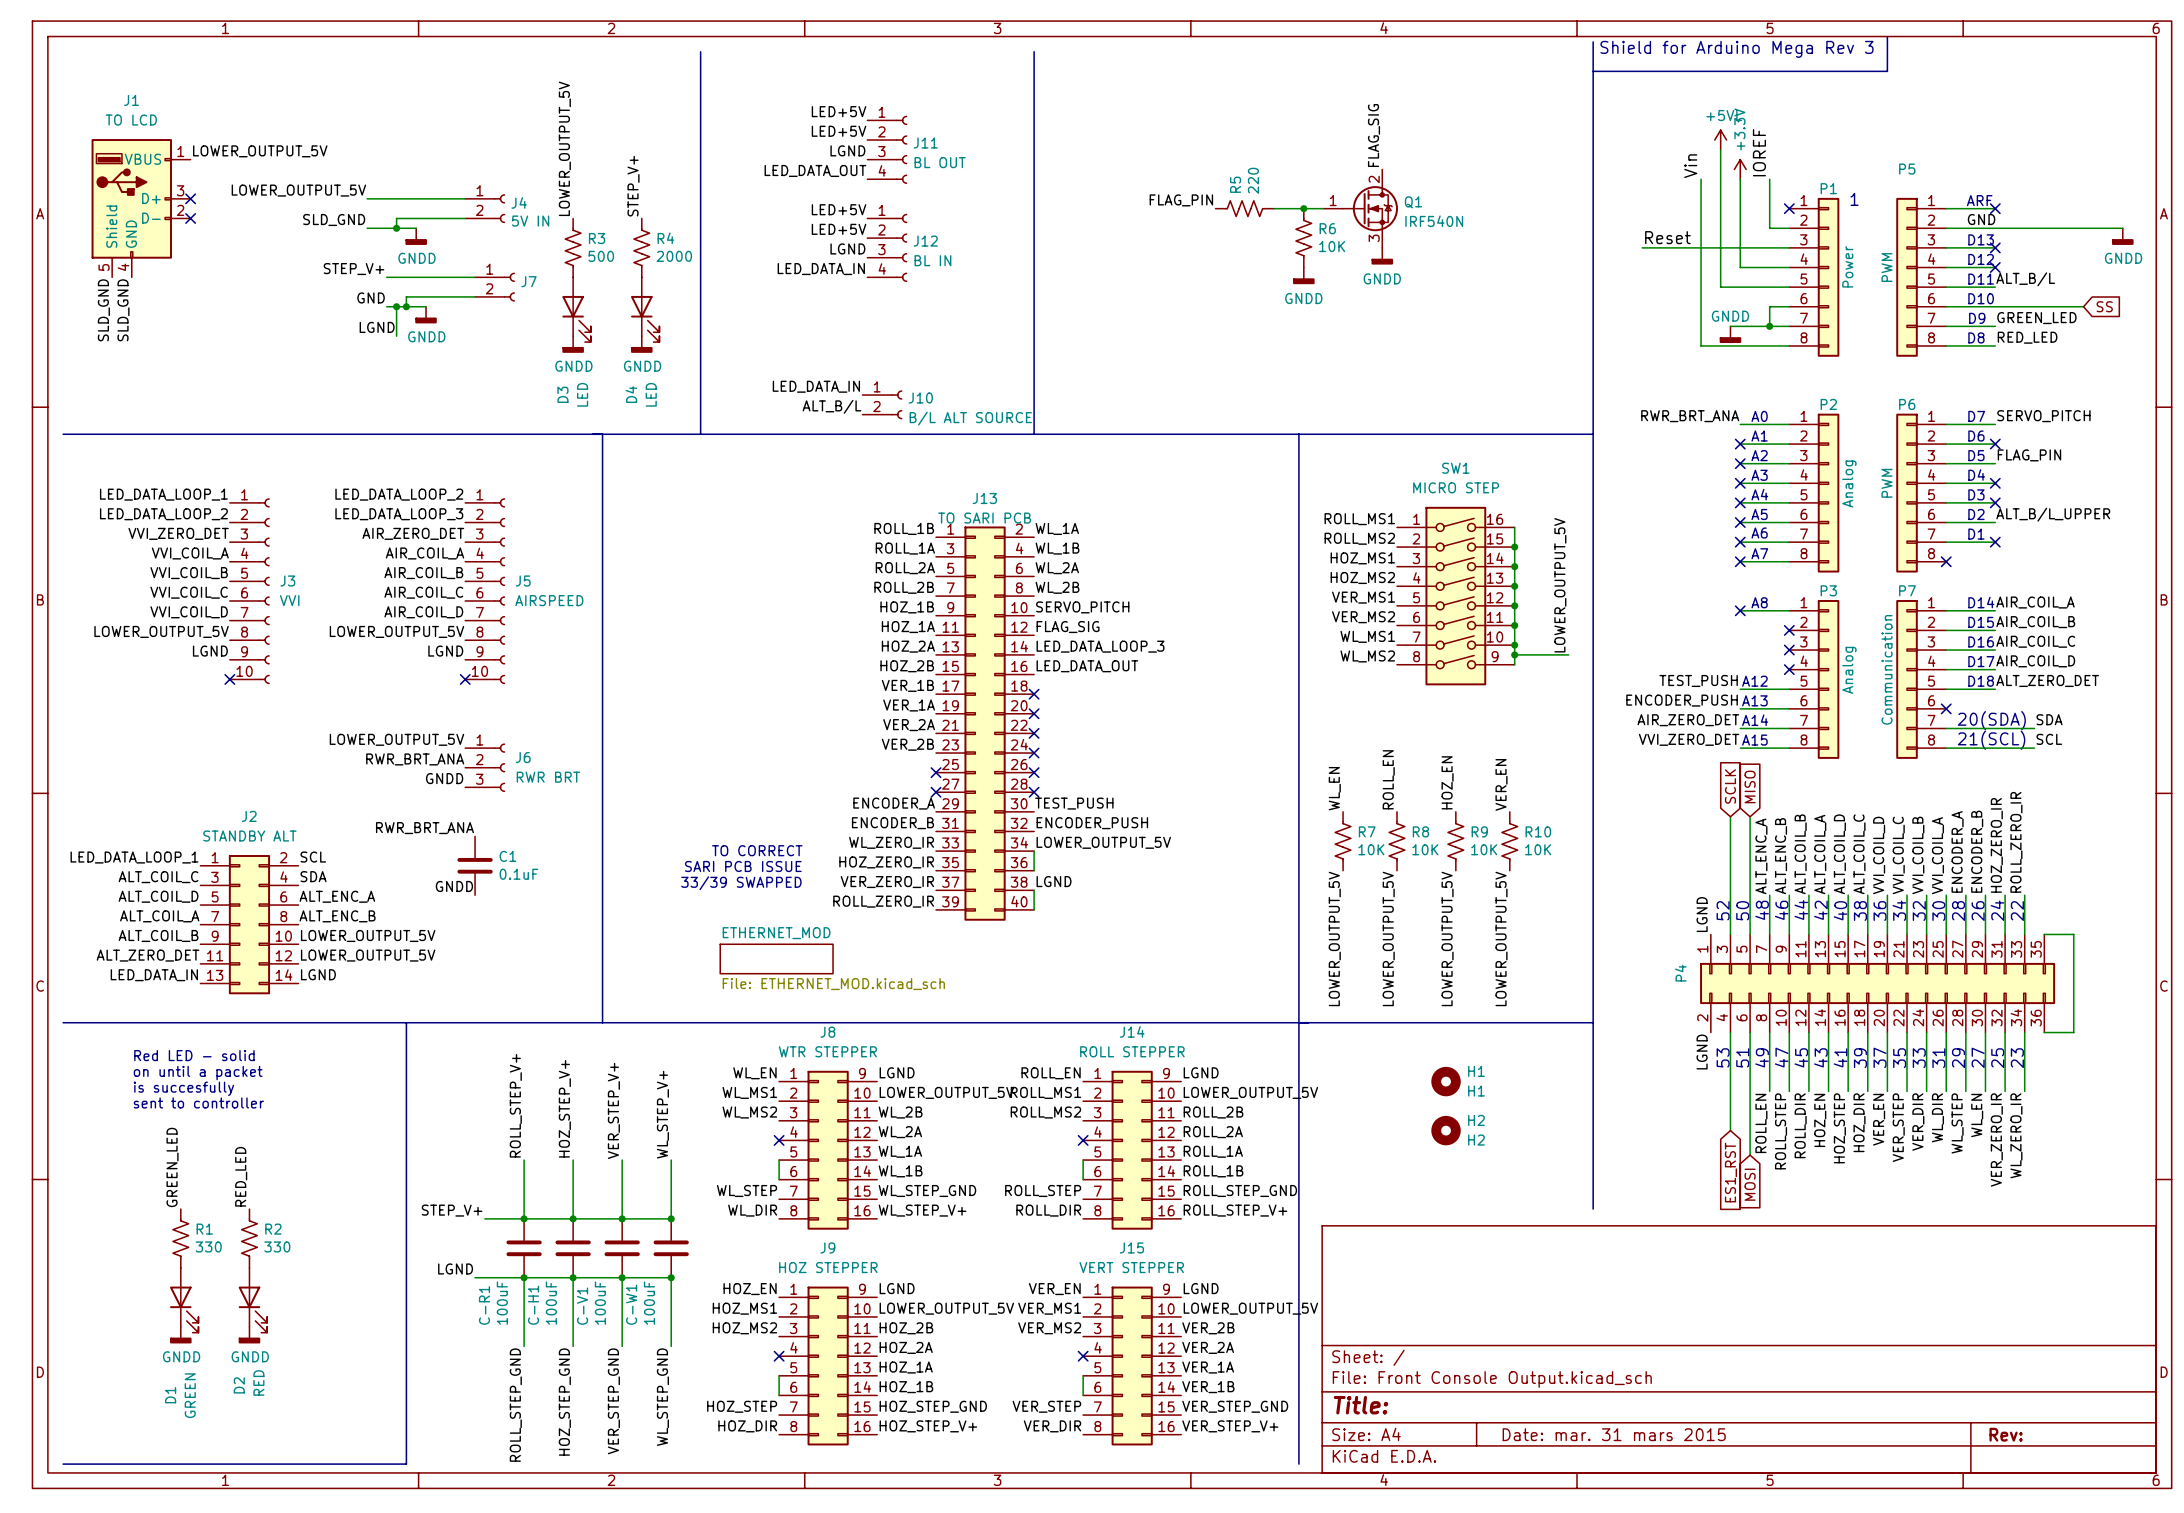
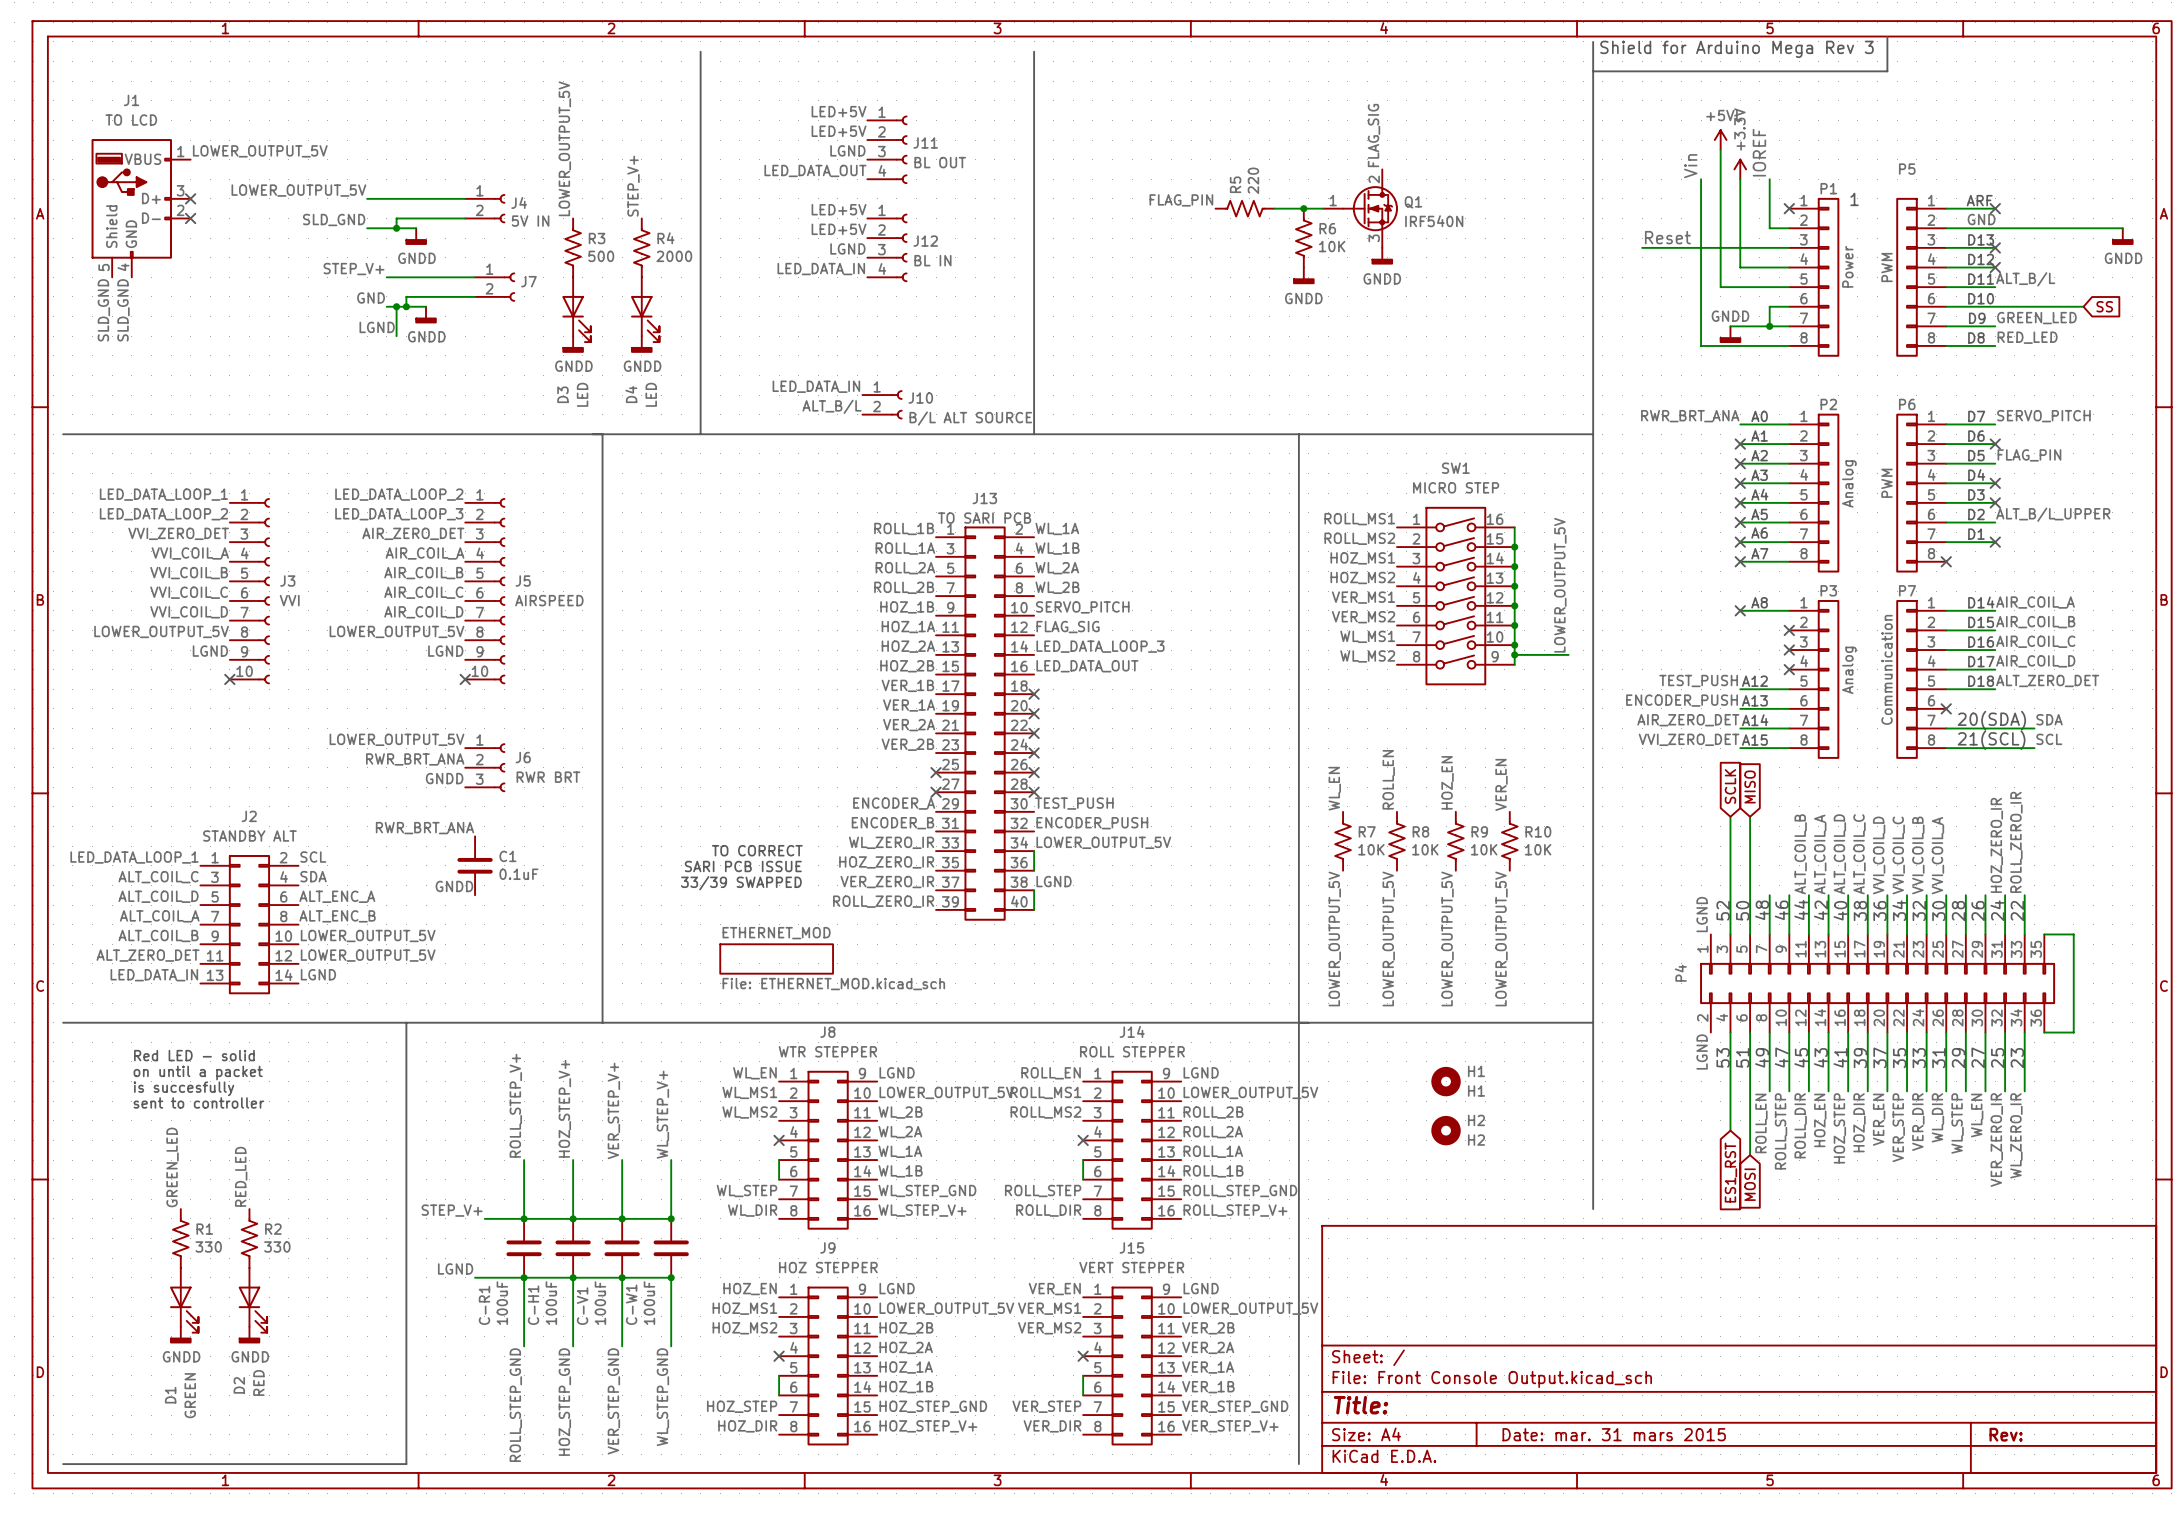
label: ENCODER_A (1957, 851) -> none
label: ENCODER_B (1977, 851) -> none
label: ALT_ENC_A (1761, 856) -> none
label: ALT_ENC_B (1781, 856) -> none

